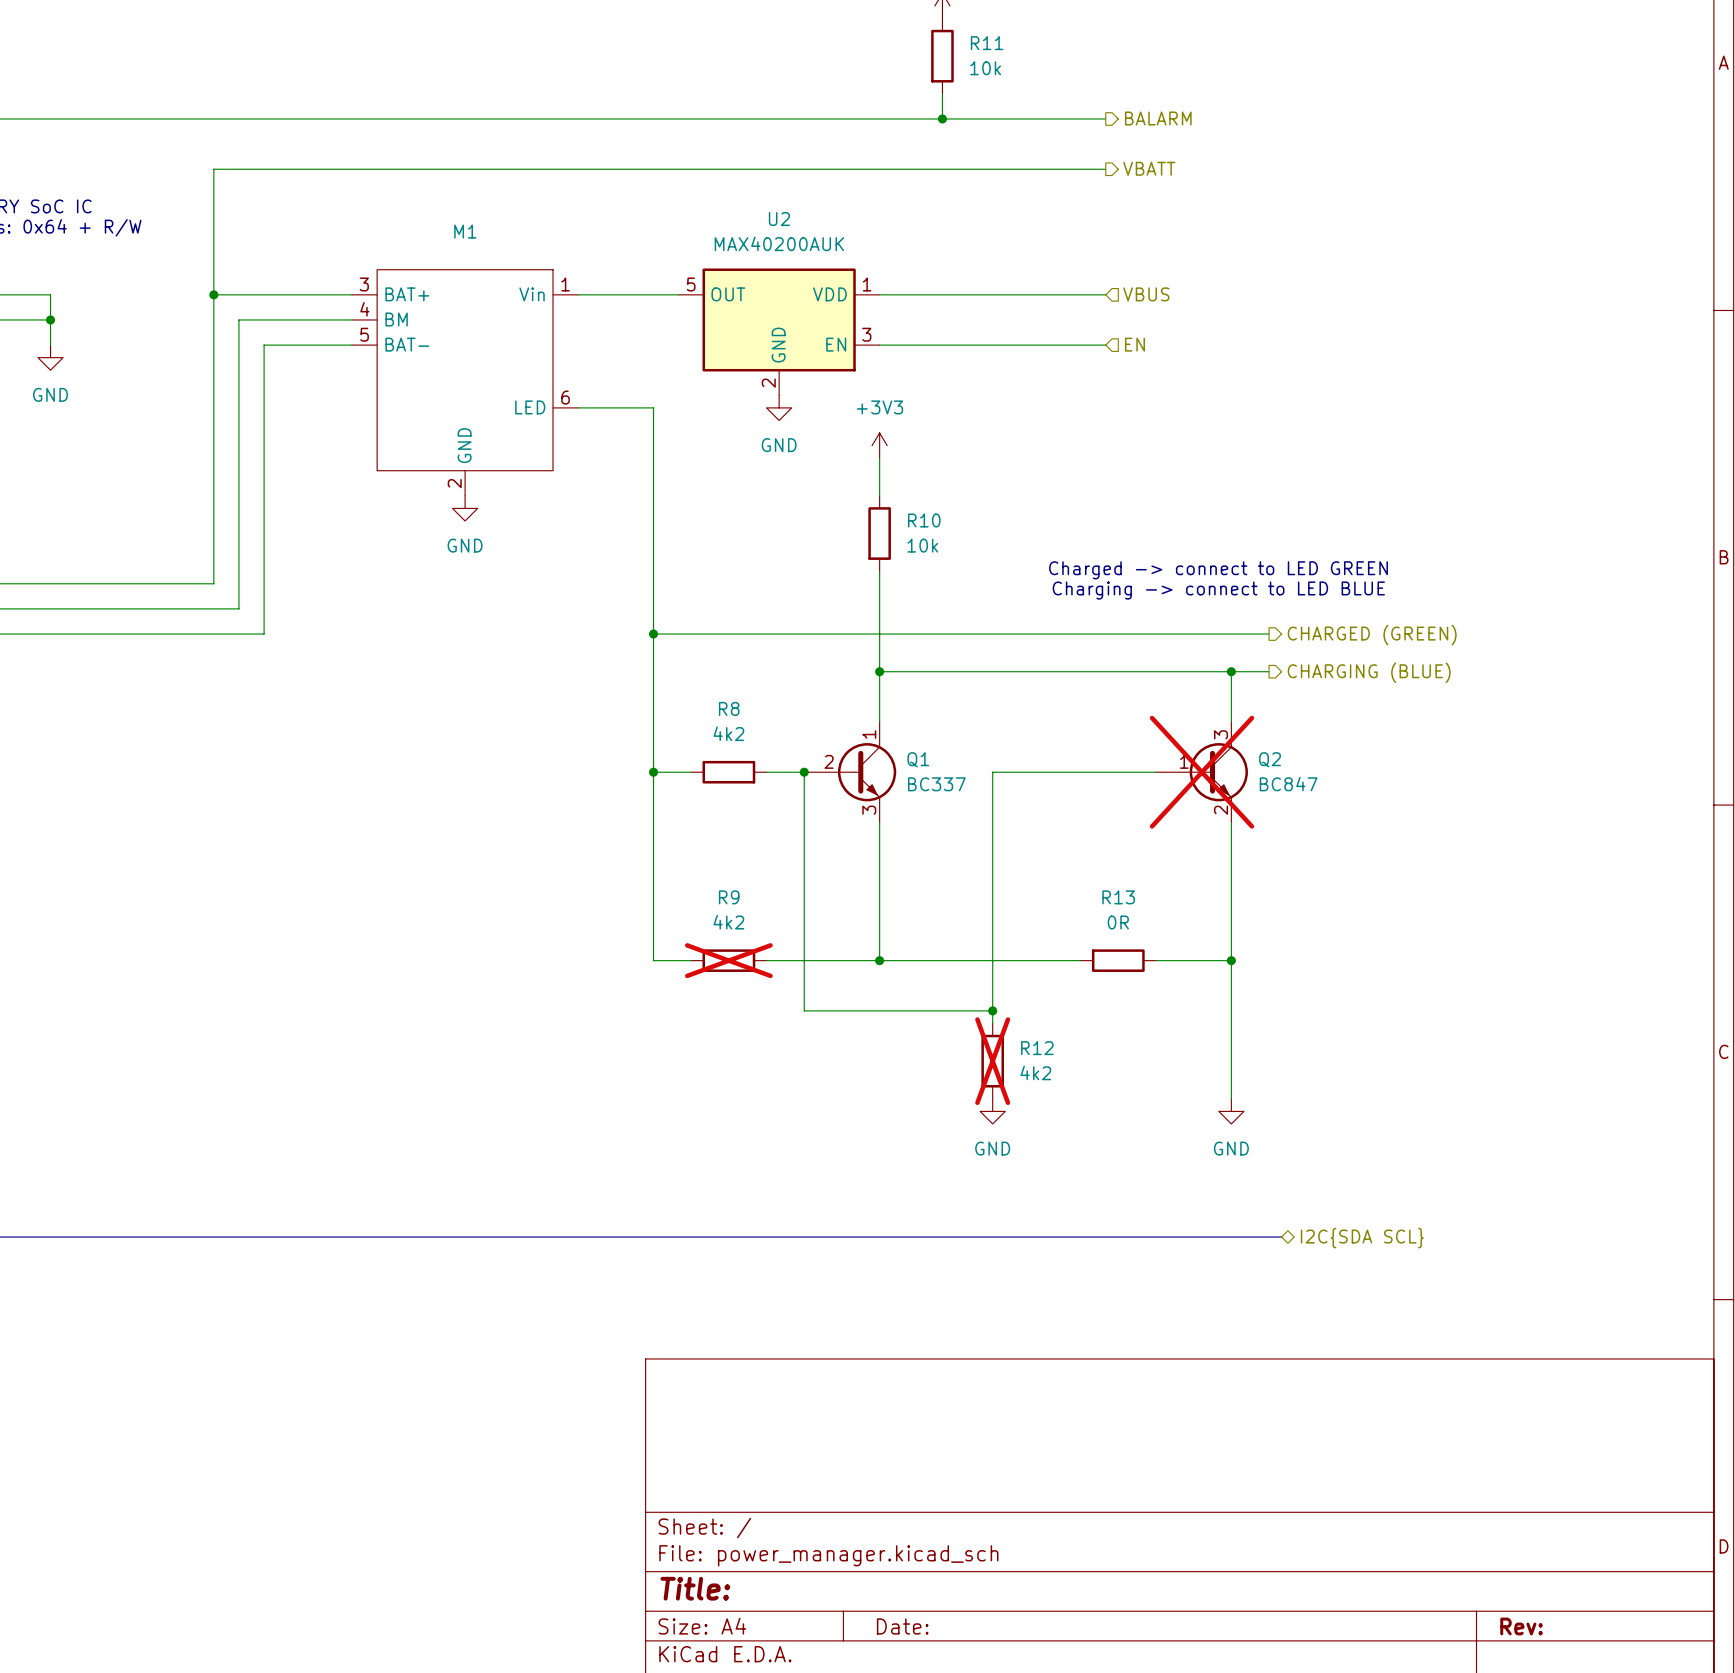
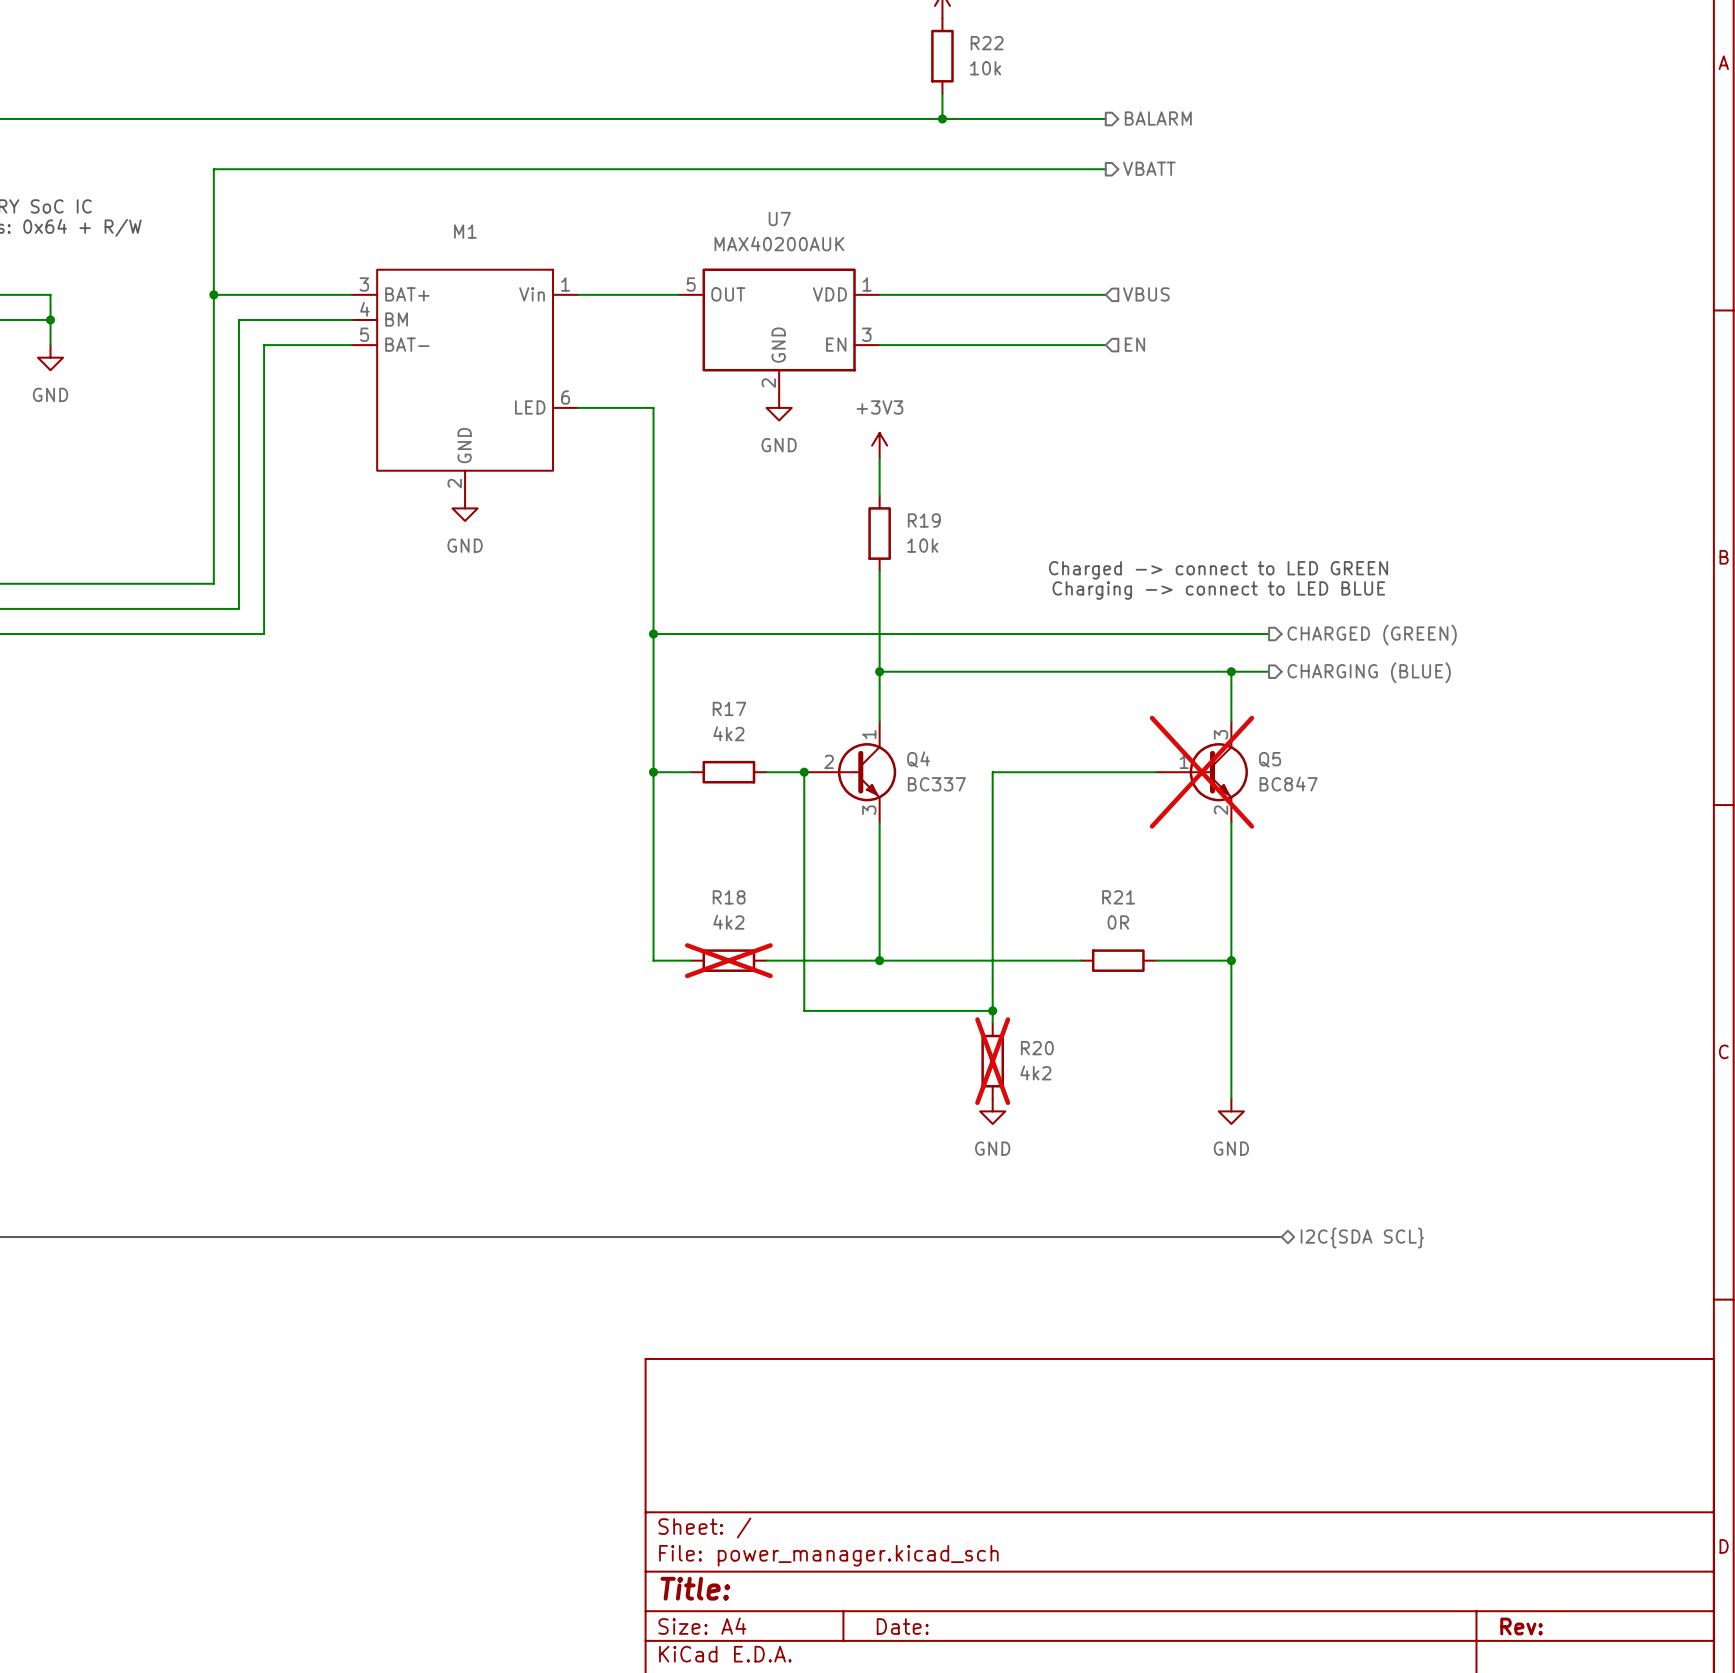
R11 name: R11 (987, 43) -> R22 (987, 43)
U2 name: U2 (779, 219) -> U7 (779, 219)
R10 name: R10 (924, 520) -> R19 (924, 520)
R8 name: R8 (729, 708) -> R17 (729, 708)
Q1 name: Q1 (918, 759) -> Q4 (918, 759)
Q2 name: Q2 (1270, 759) -> Q5 (1270, 759)
R9 name: R9 (729, 897) -> R18 (729, 897)
R13 name: R13 (1118, 897) -> R21 (1118, 897)
R12 name: R12 (1037, 1048) -> R20 (1037, 1048)

